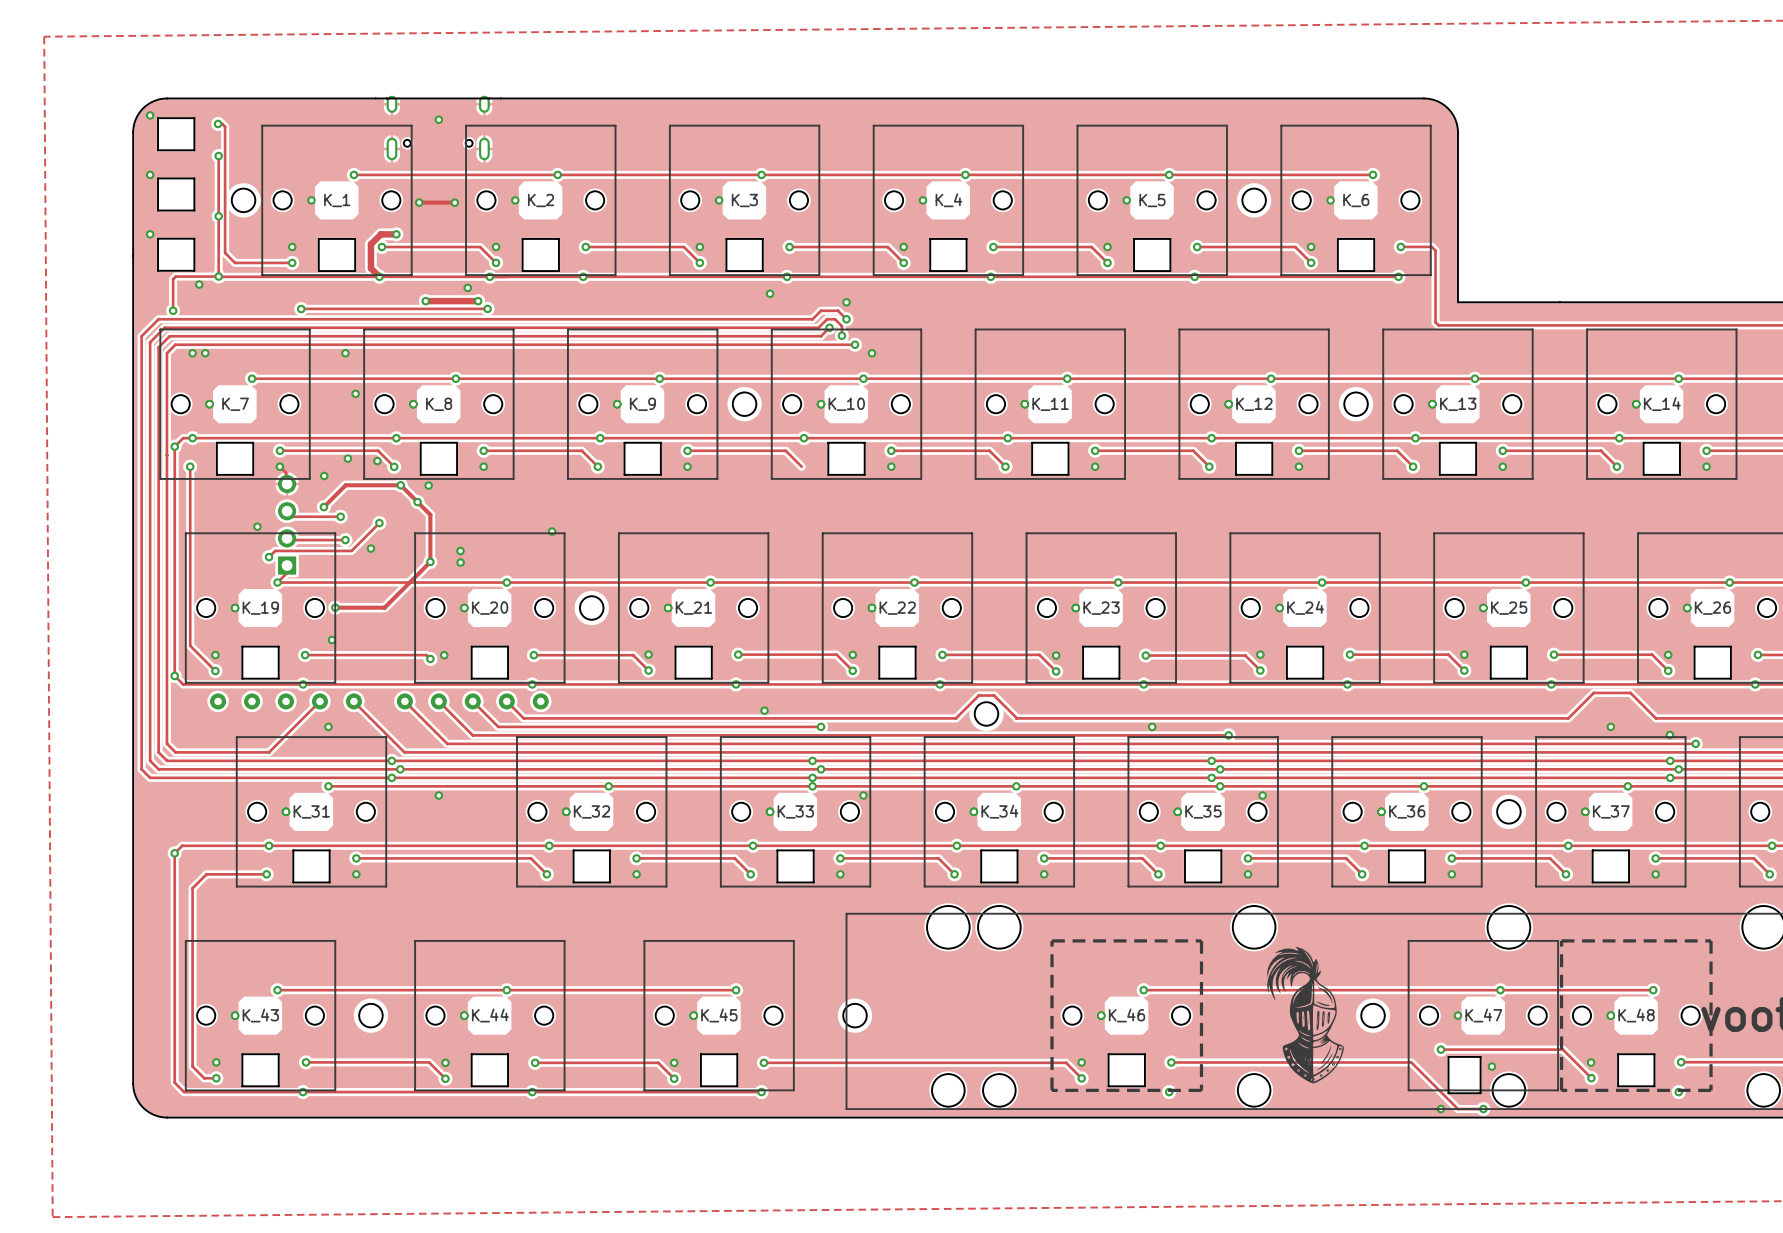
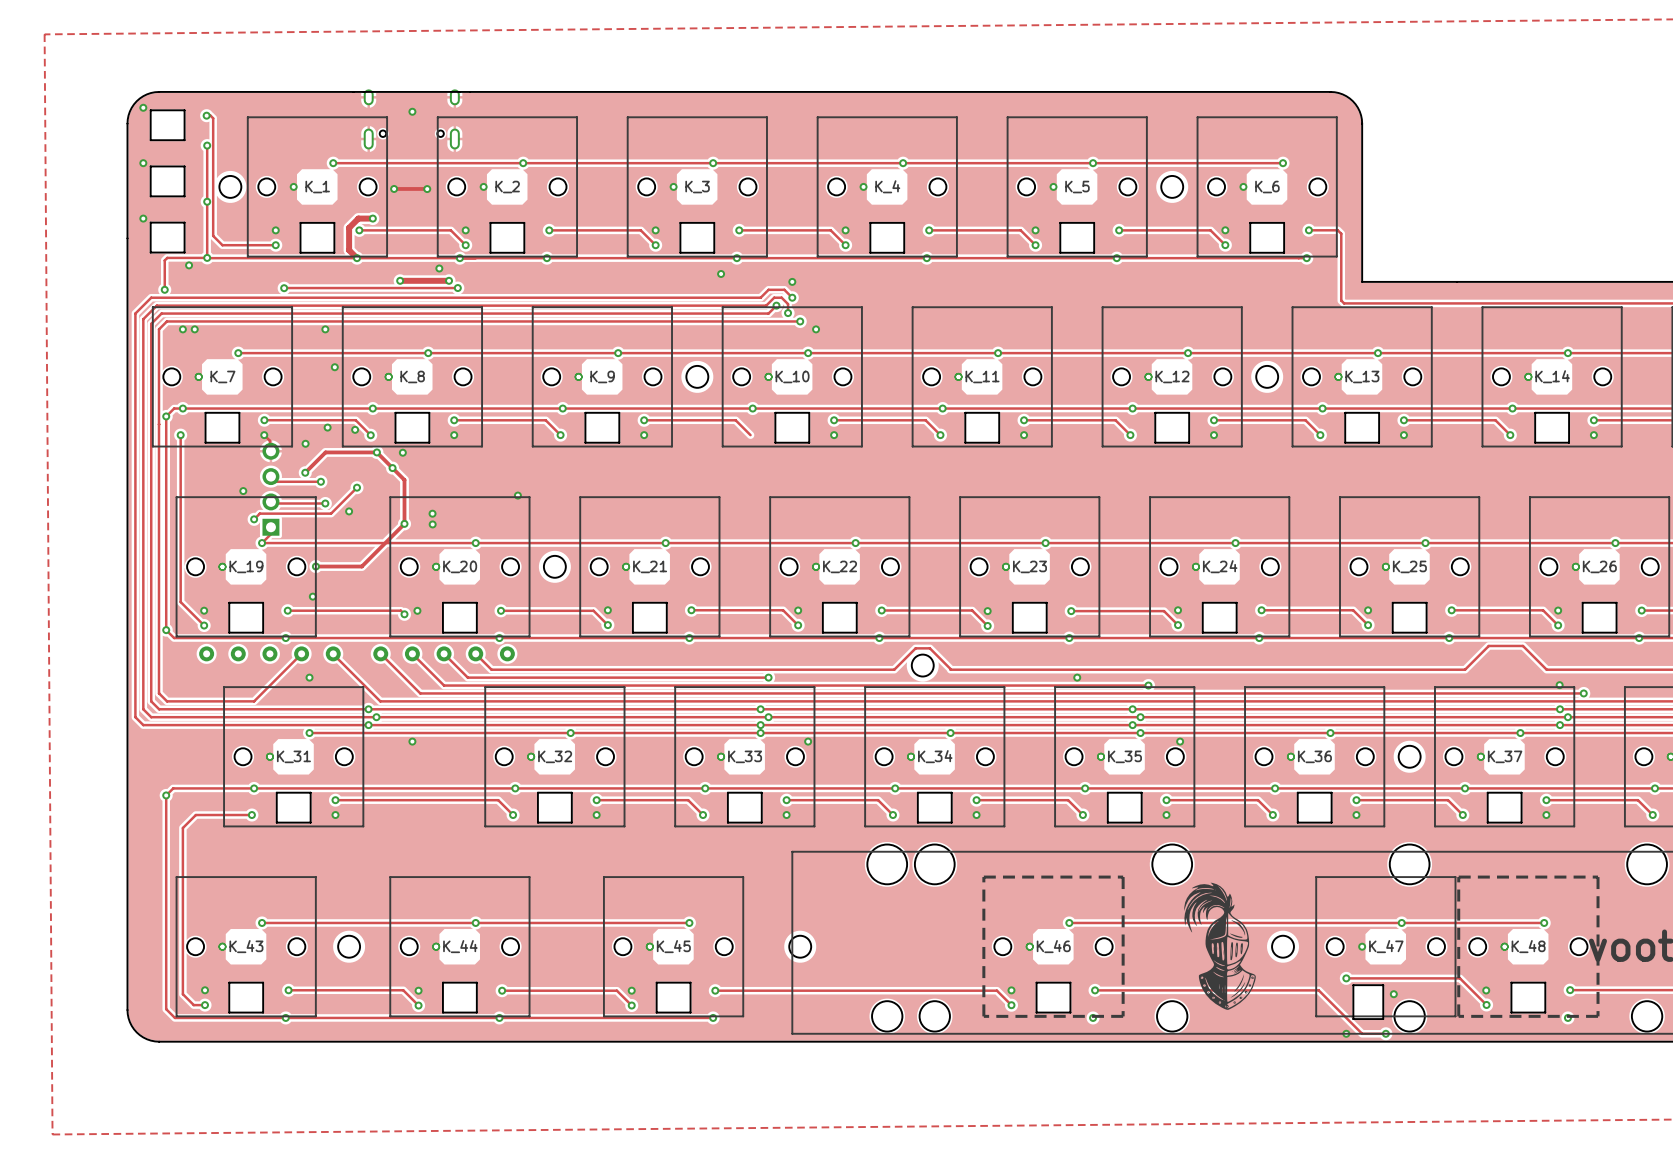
via: (764, 710) -> none
via: (1610, 726) -> none

